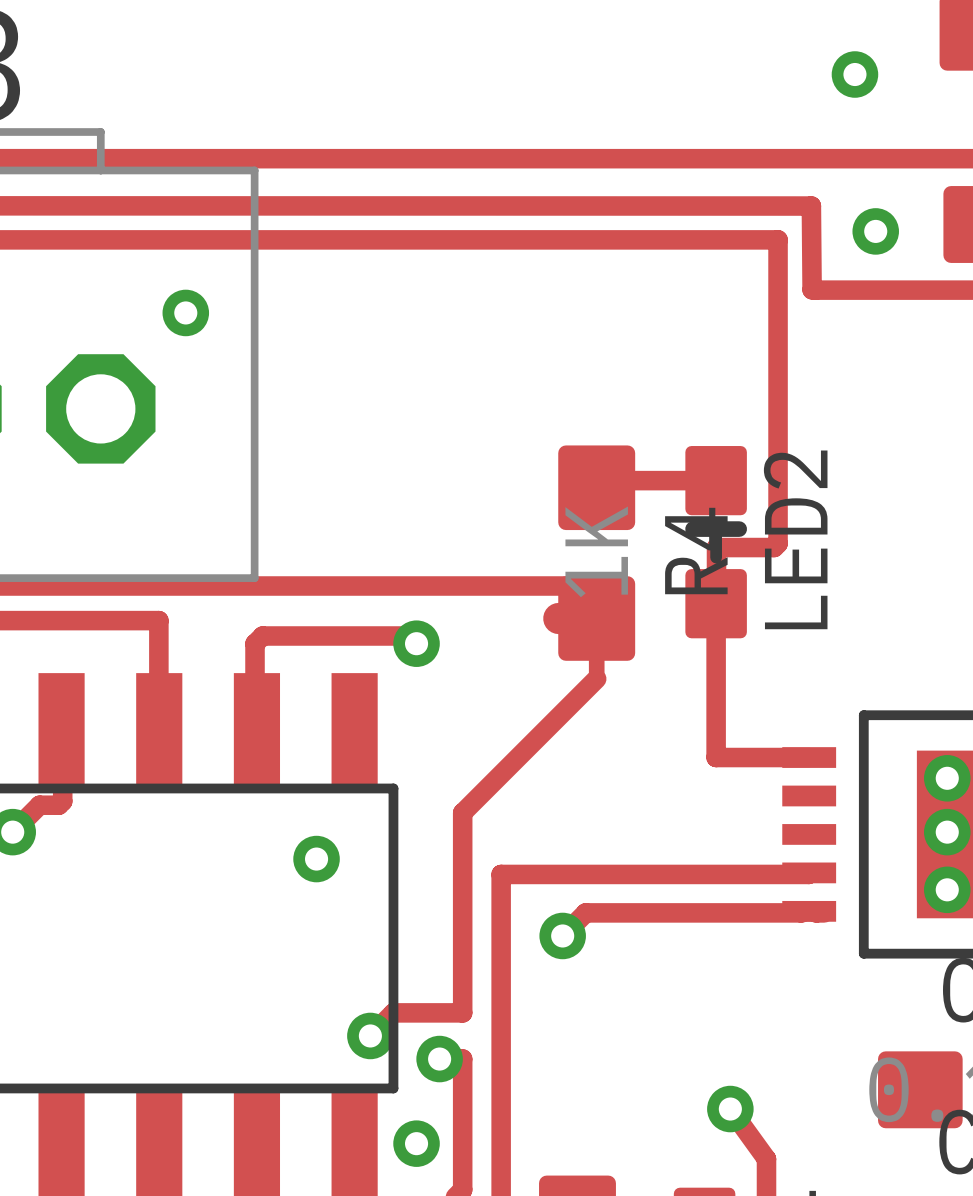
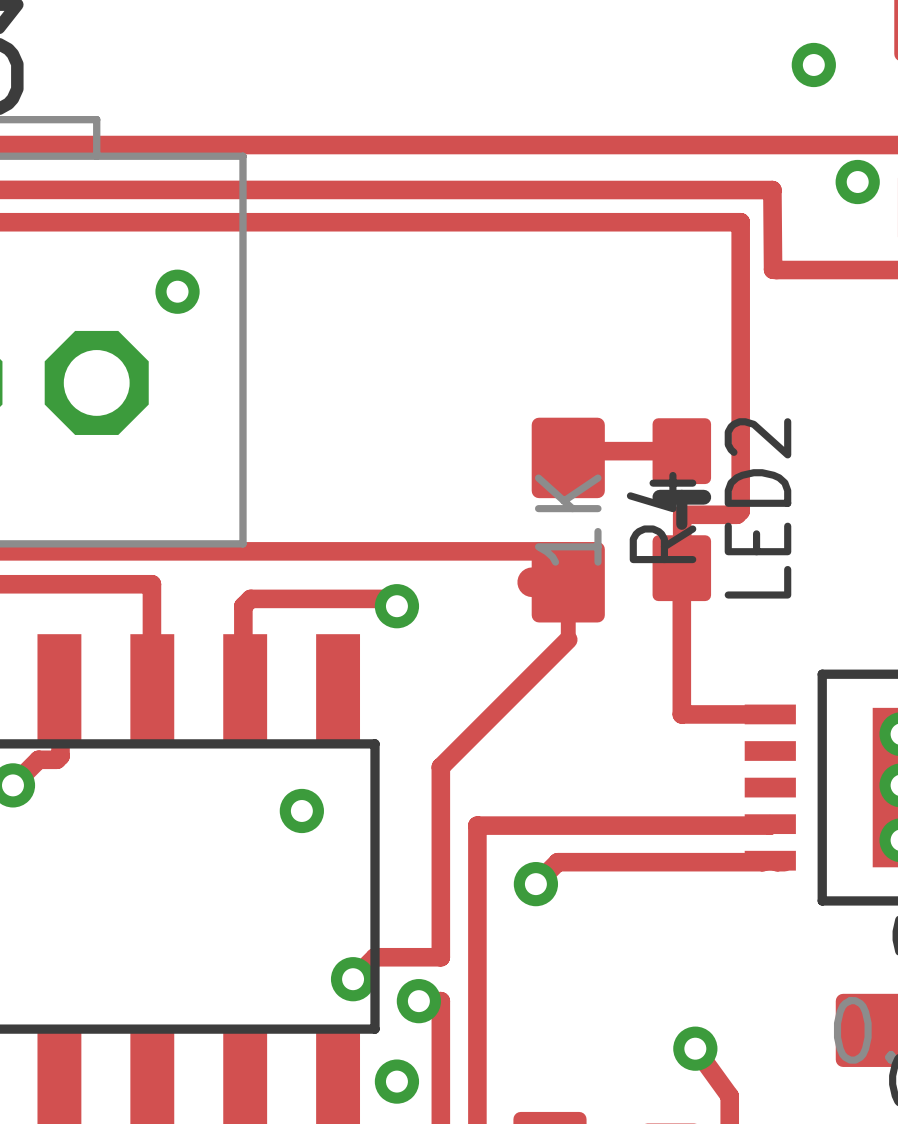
via position: (875, 231) -> (857, 182)

